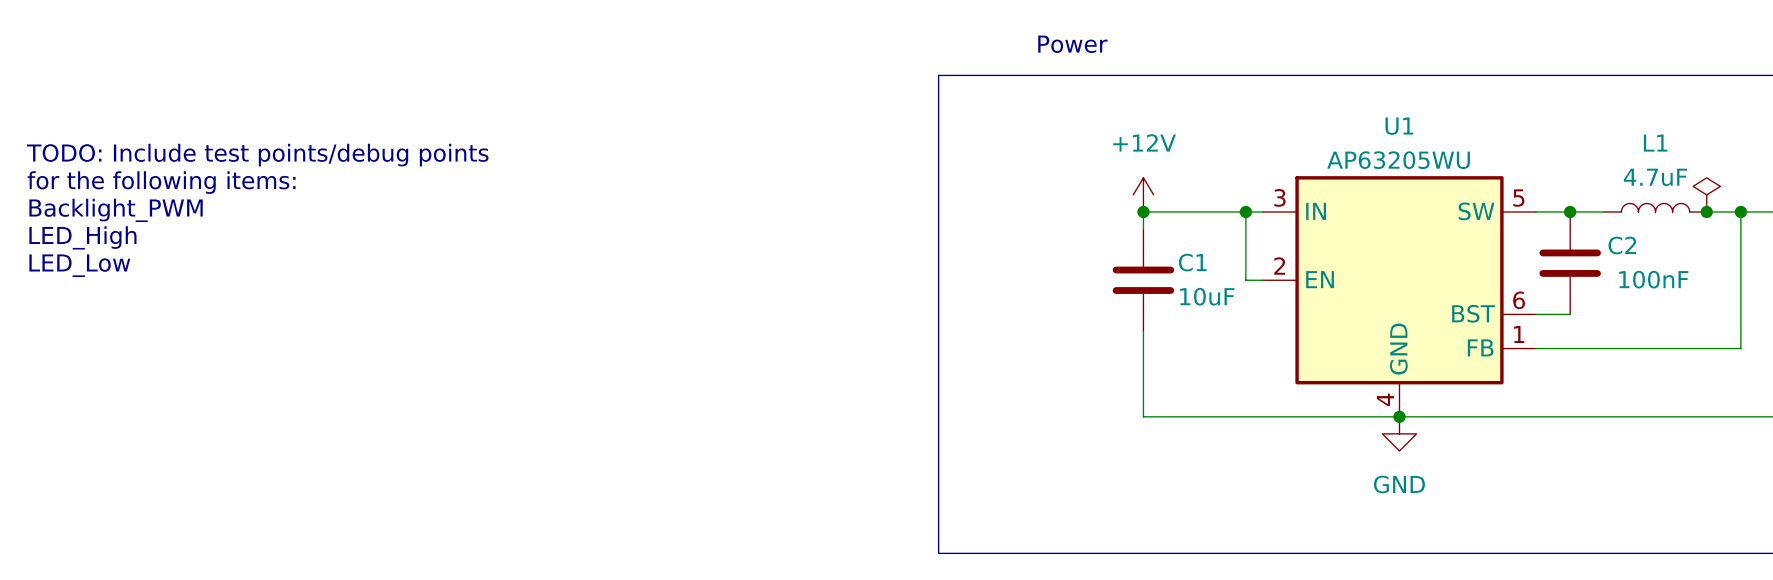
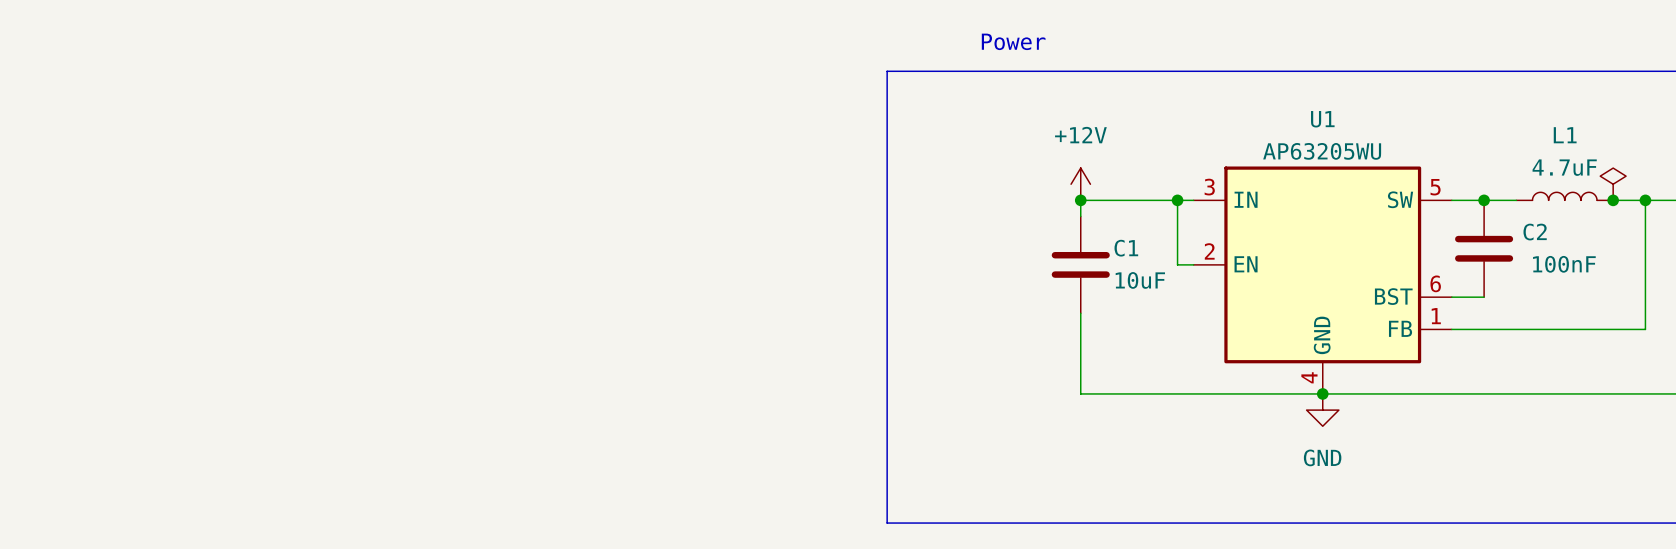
text: TODO: Include test points/debug points (257, 155) -> none
text: for the following items: (161, 182) -> none
text: Backlight_PWM (116, 210) -> none
text: LED_High (82, 237) -> none
text: LED_Low (79, 265) -> none

